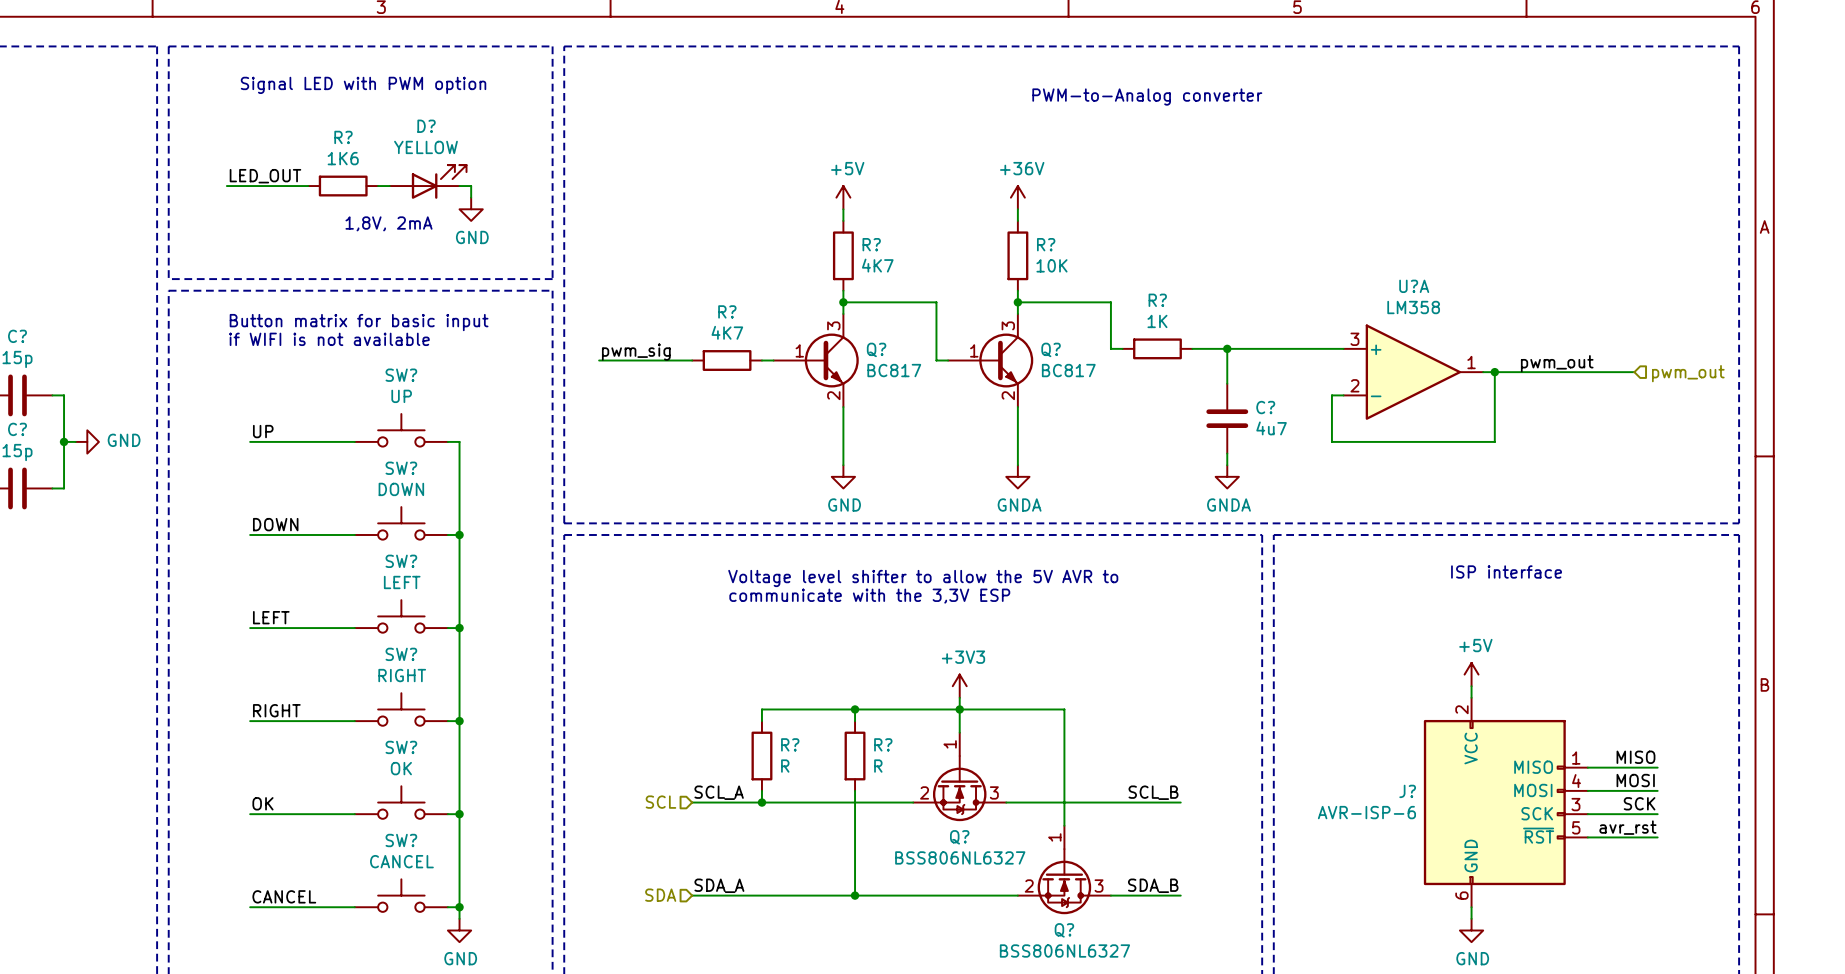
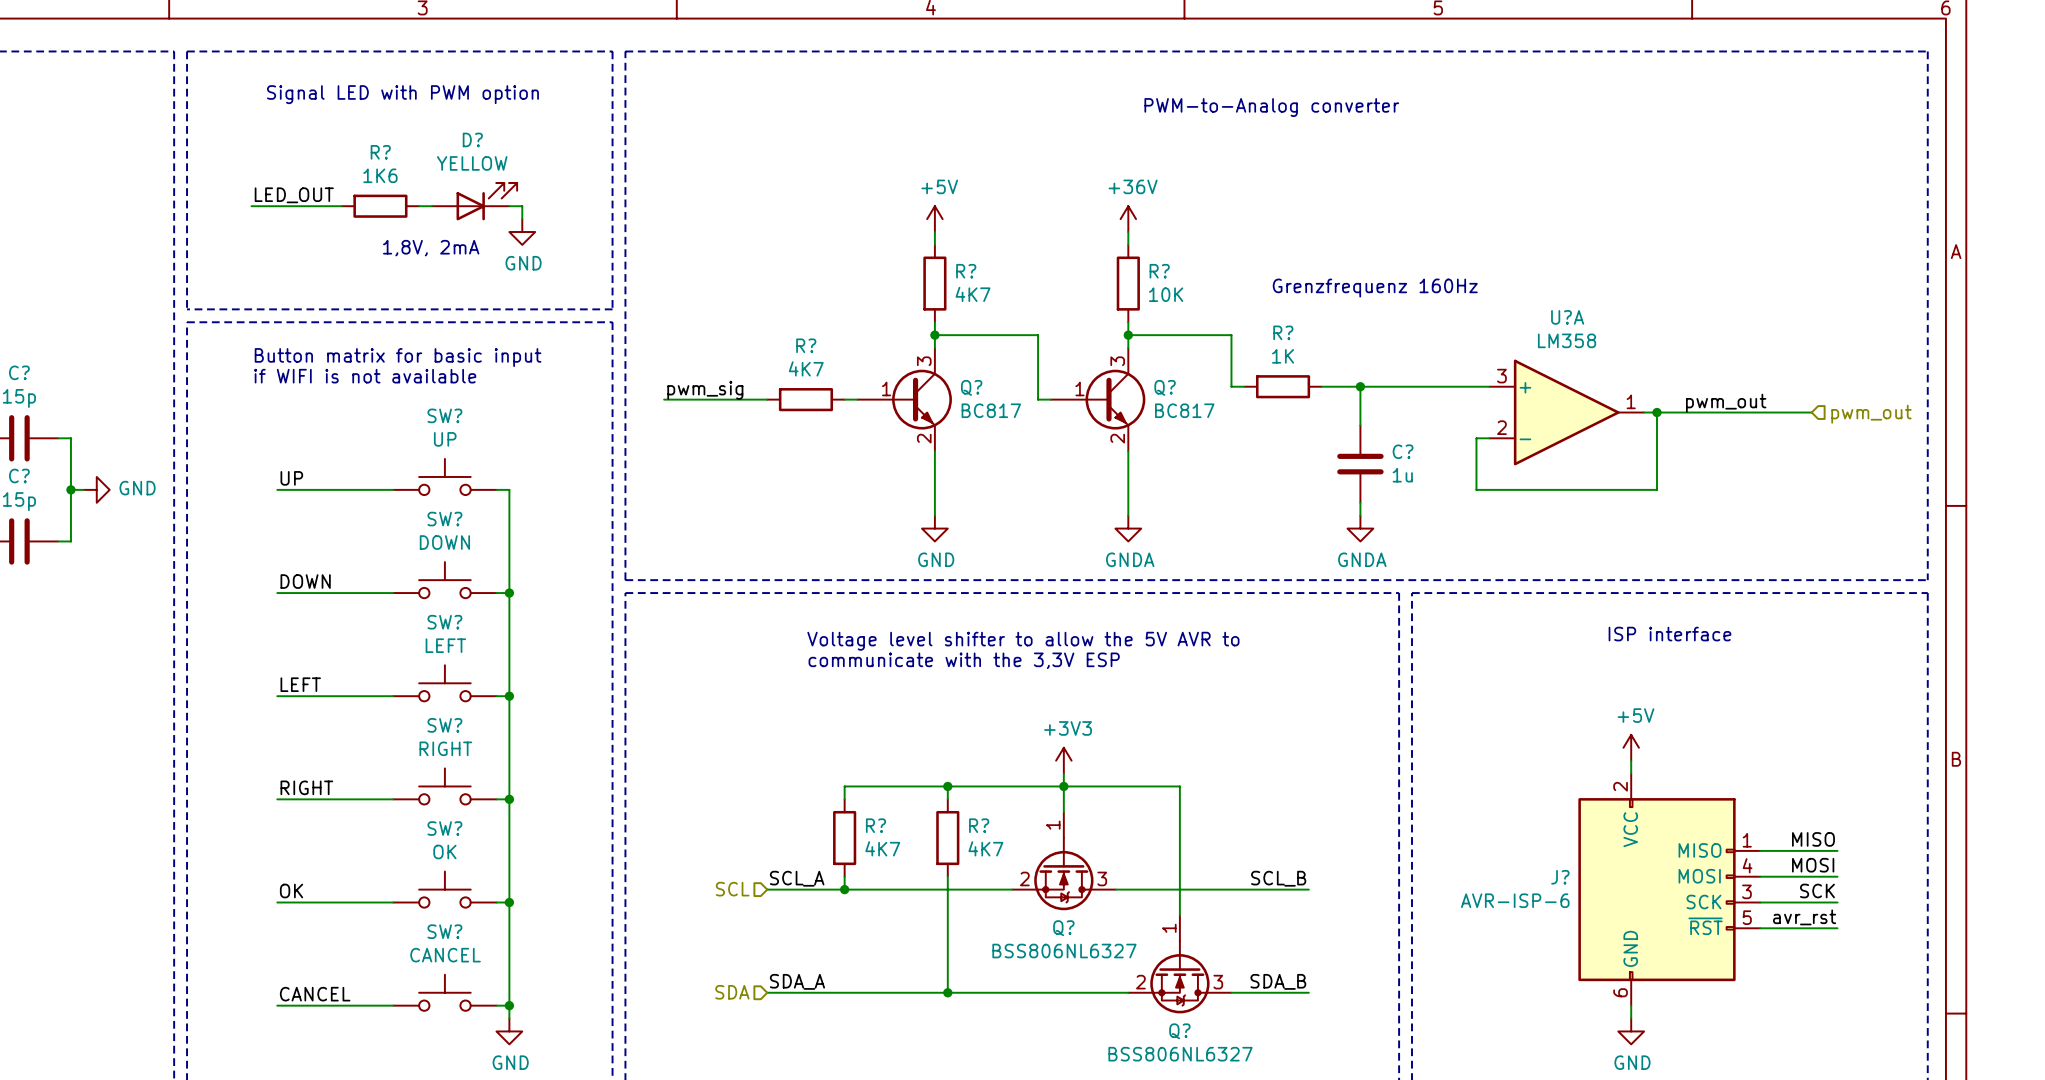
text: none -> Grenzfrequenz 160Hz (1375, 288)
C? value: 4u7 (1271, 428) -> 1u (1402, 475)
R? value: R (785, 766) -> 4K7 (882, 848)
R? value: R (878, 766) -> 4K7 (985, 848)

